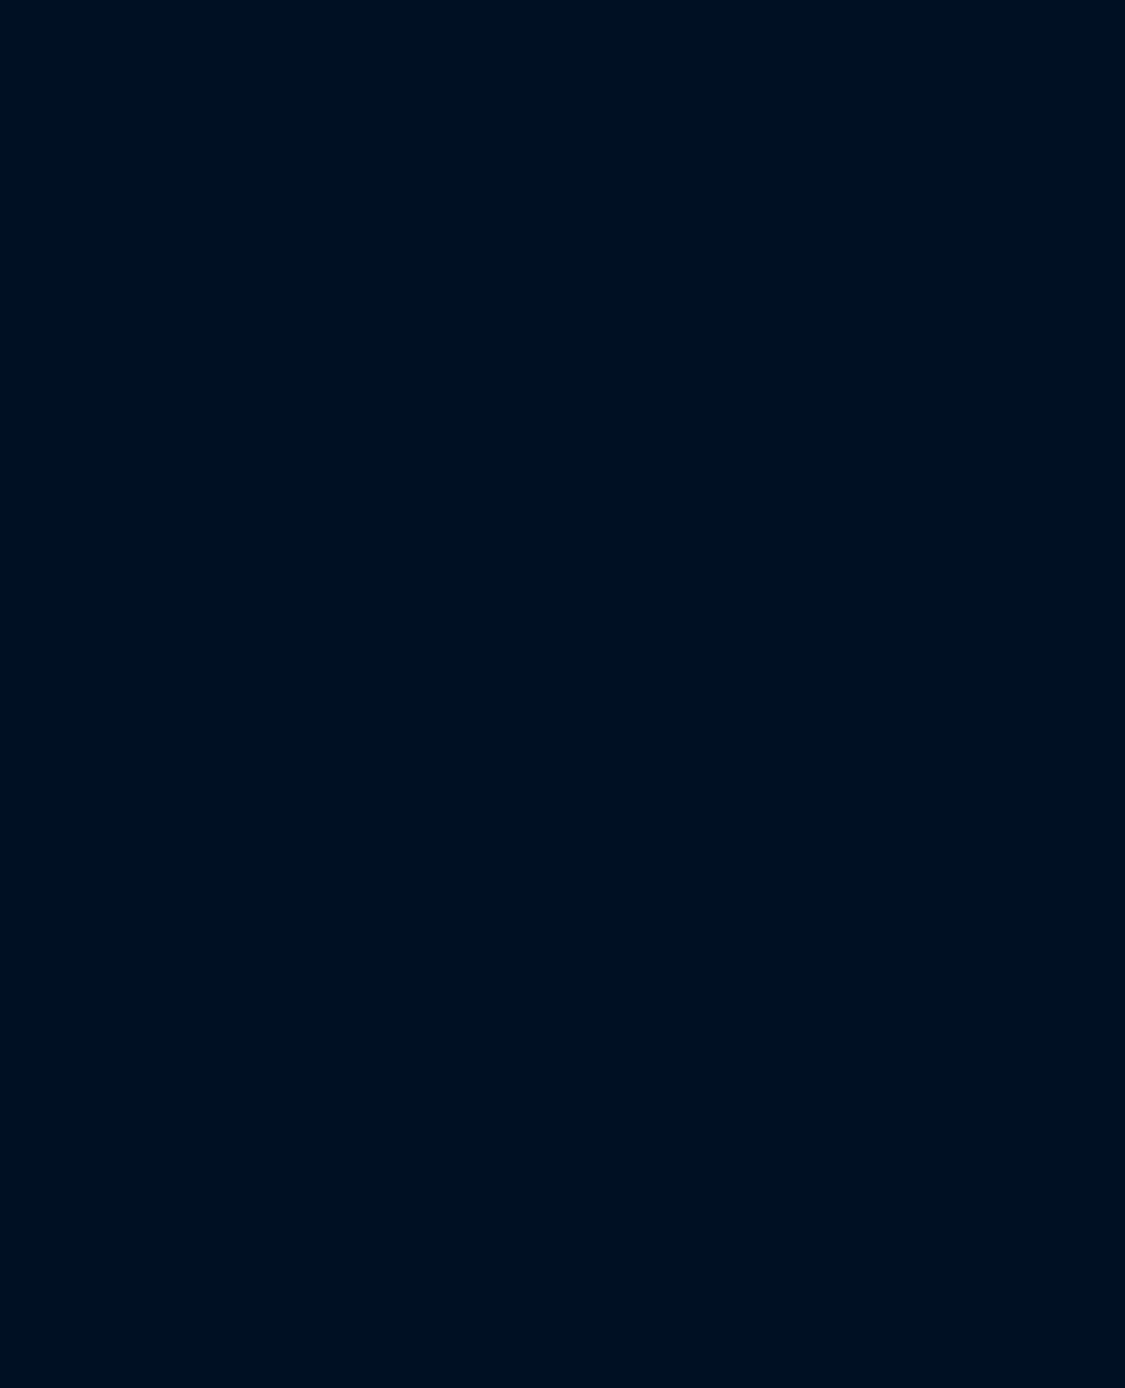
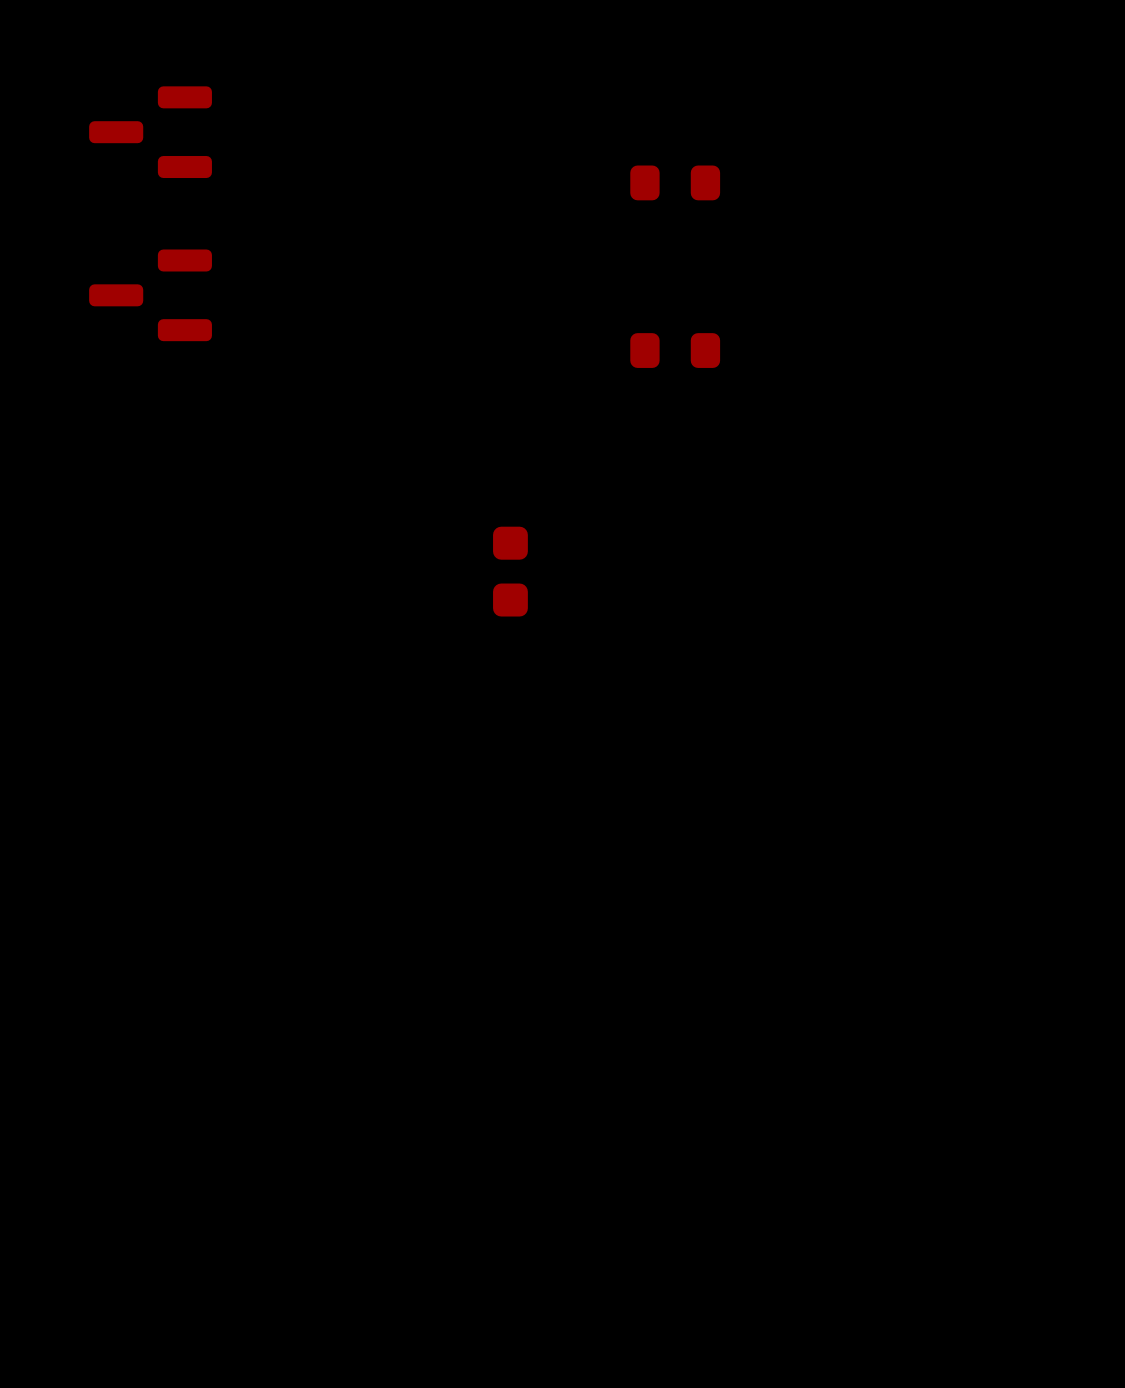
part: none -> (150, 132)
part: none -> (675, 182)
part: none -> (150, 295)
part: none -> (675, 350)
part: none -> (510, 571)

